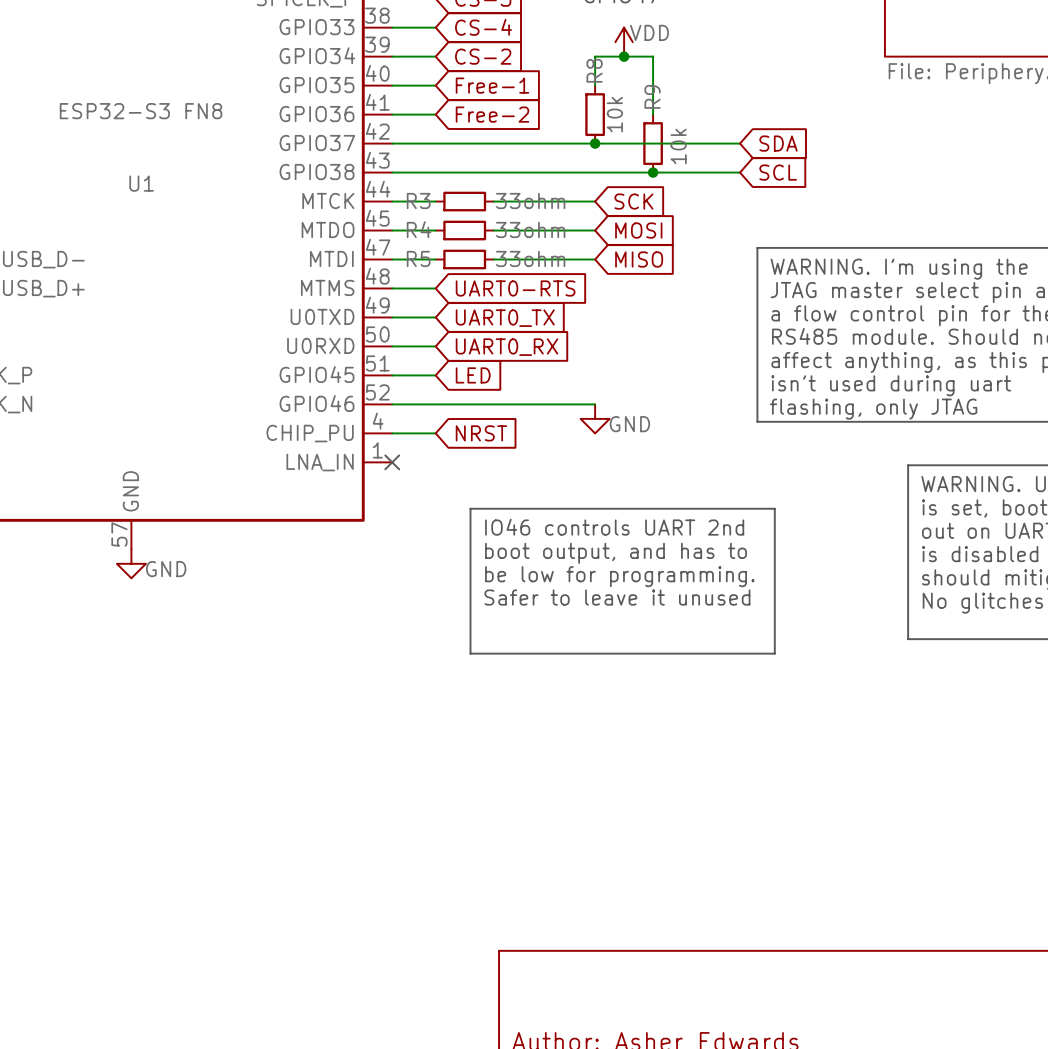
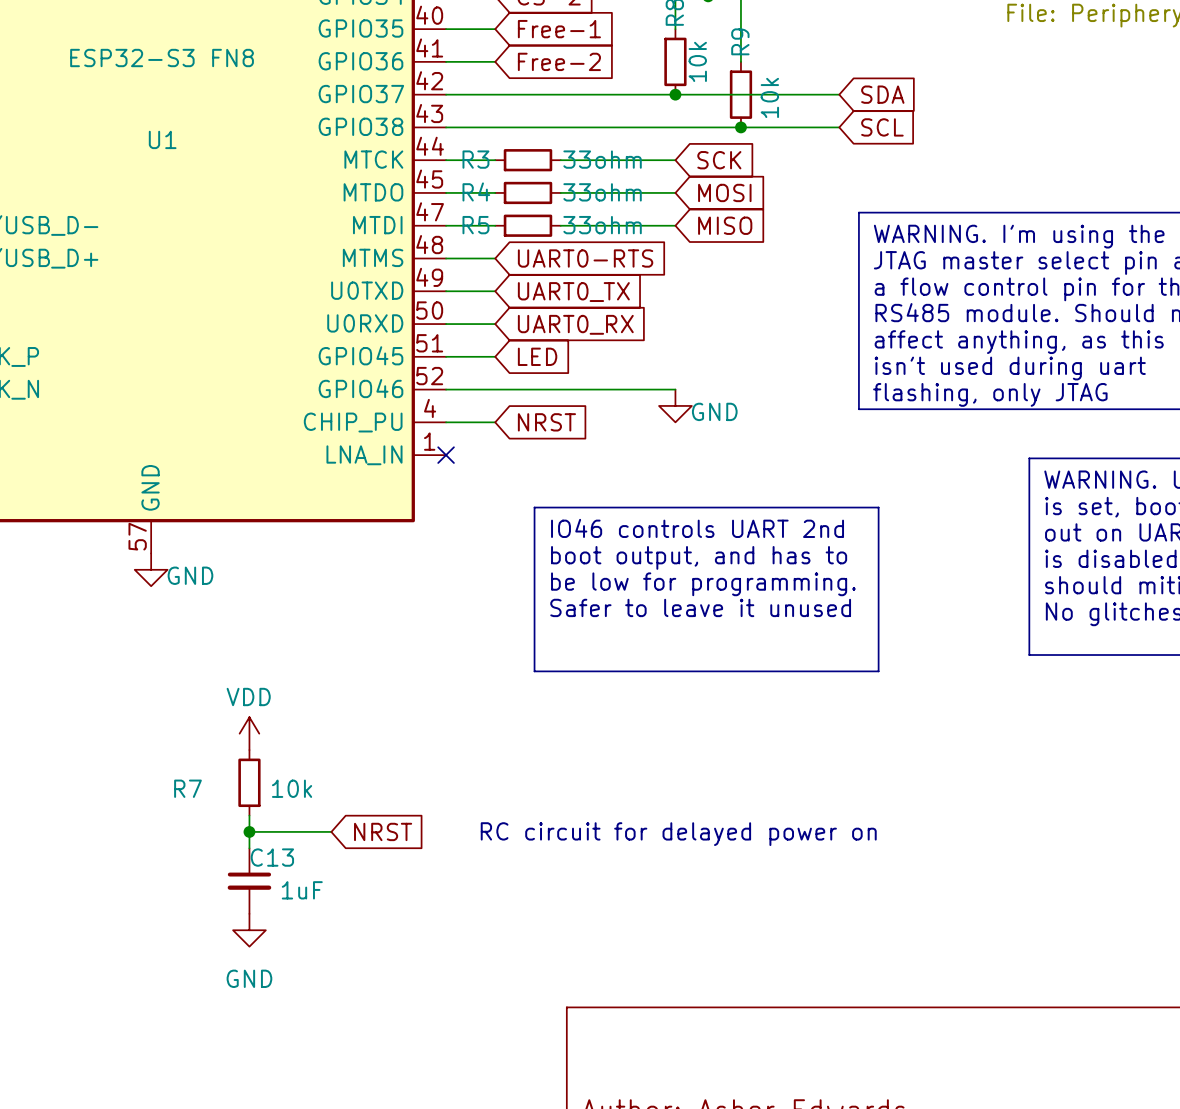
power symbol: none -> VDD (249, 733)
R7: none -> 10k (249, 782)
wire: none -> (249, 815) (249, 848)
wire: none -> (249, 831) (331, 831)
junction: none -> (249, 831)
global label: none -> NRST (383, 831)
text: none -> RC circuit for delayed power on (678, 834)
C13: none -> 1uF (249, 881)
power symbol: none -> GND (249, 930)

